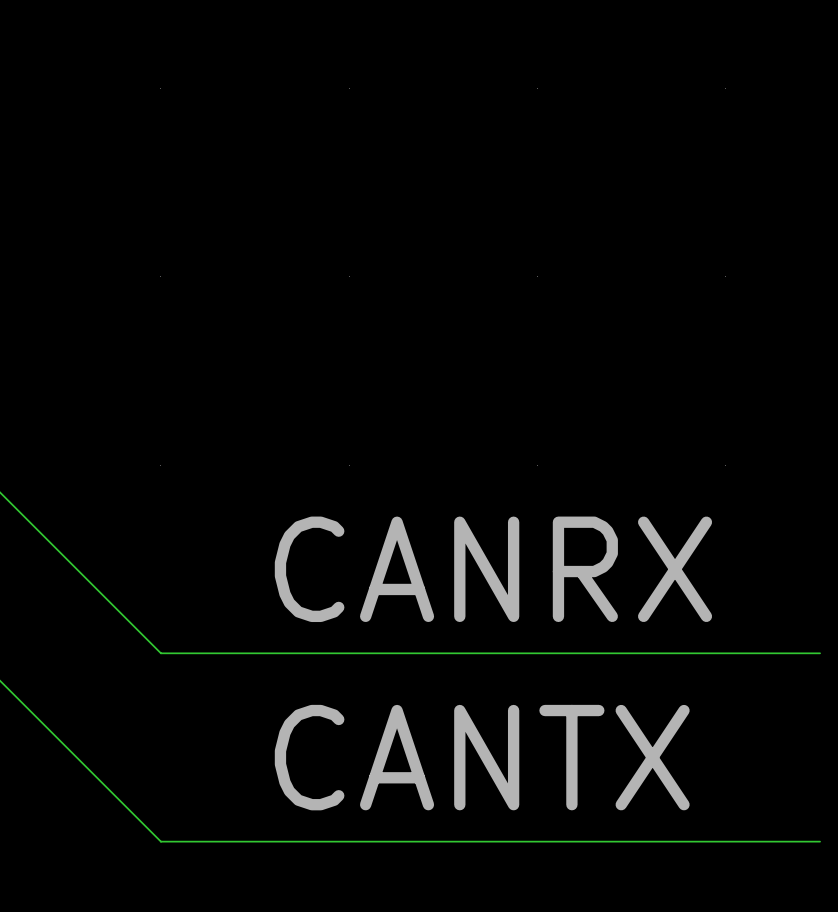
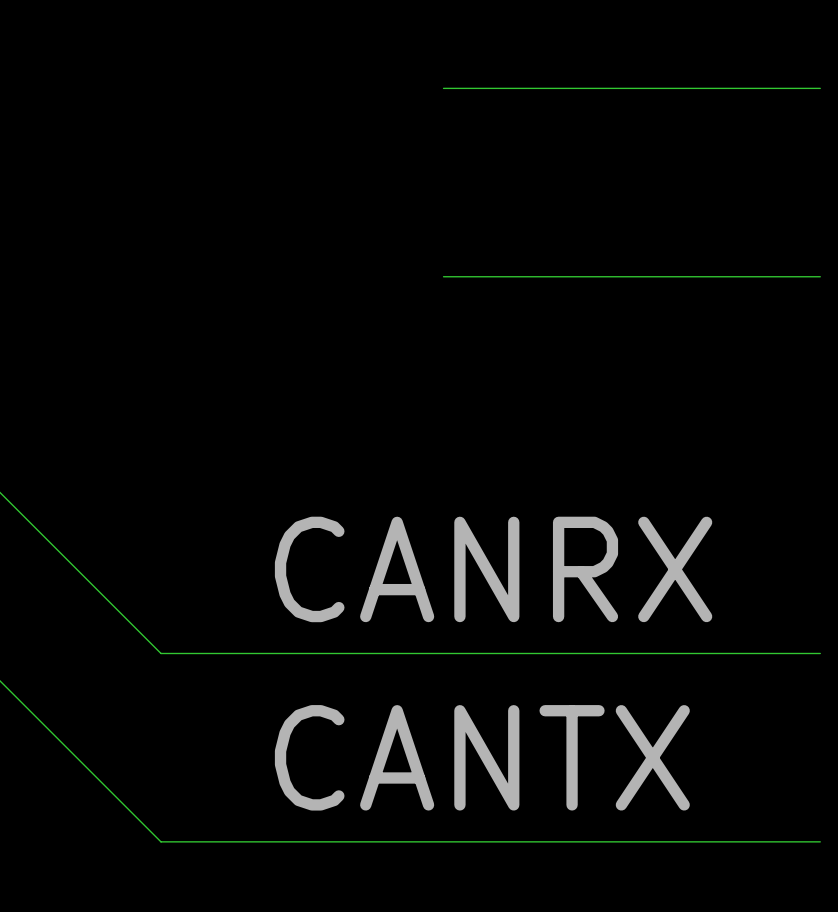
wire: none -> (443, 88) (820, 88)
wire: none -> (443, 276) (820, 276)

